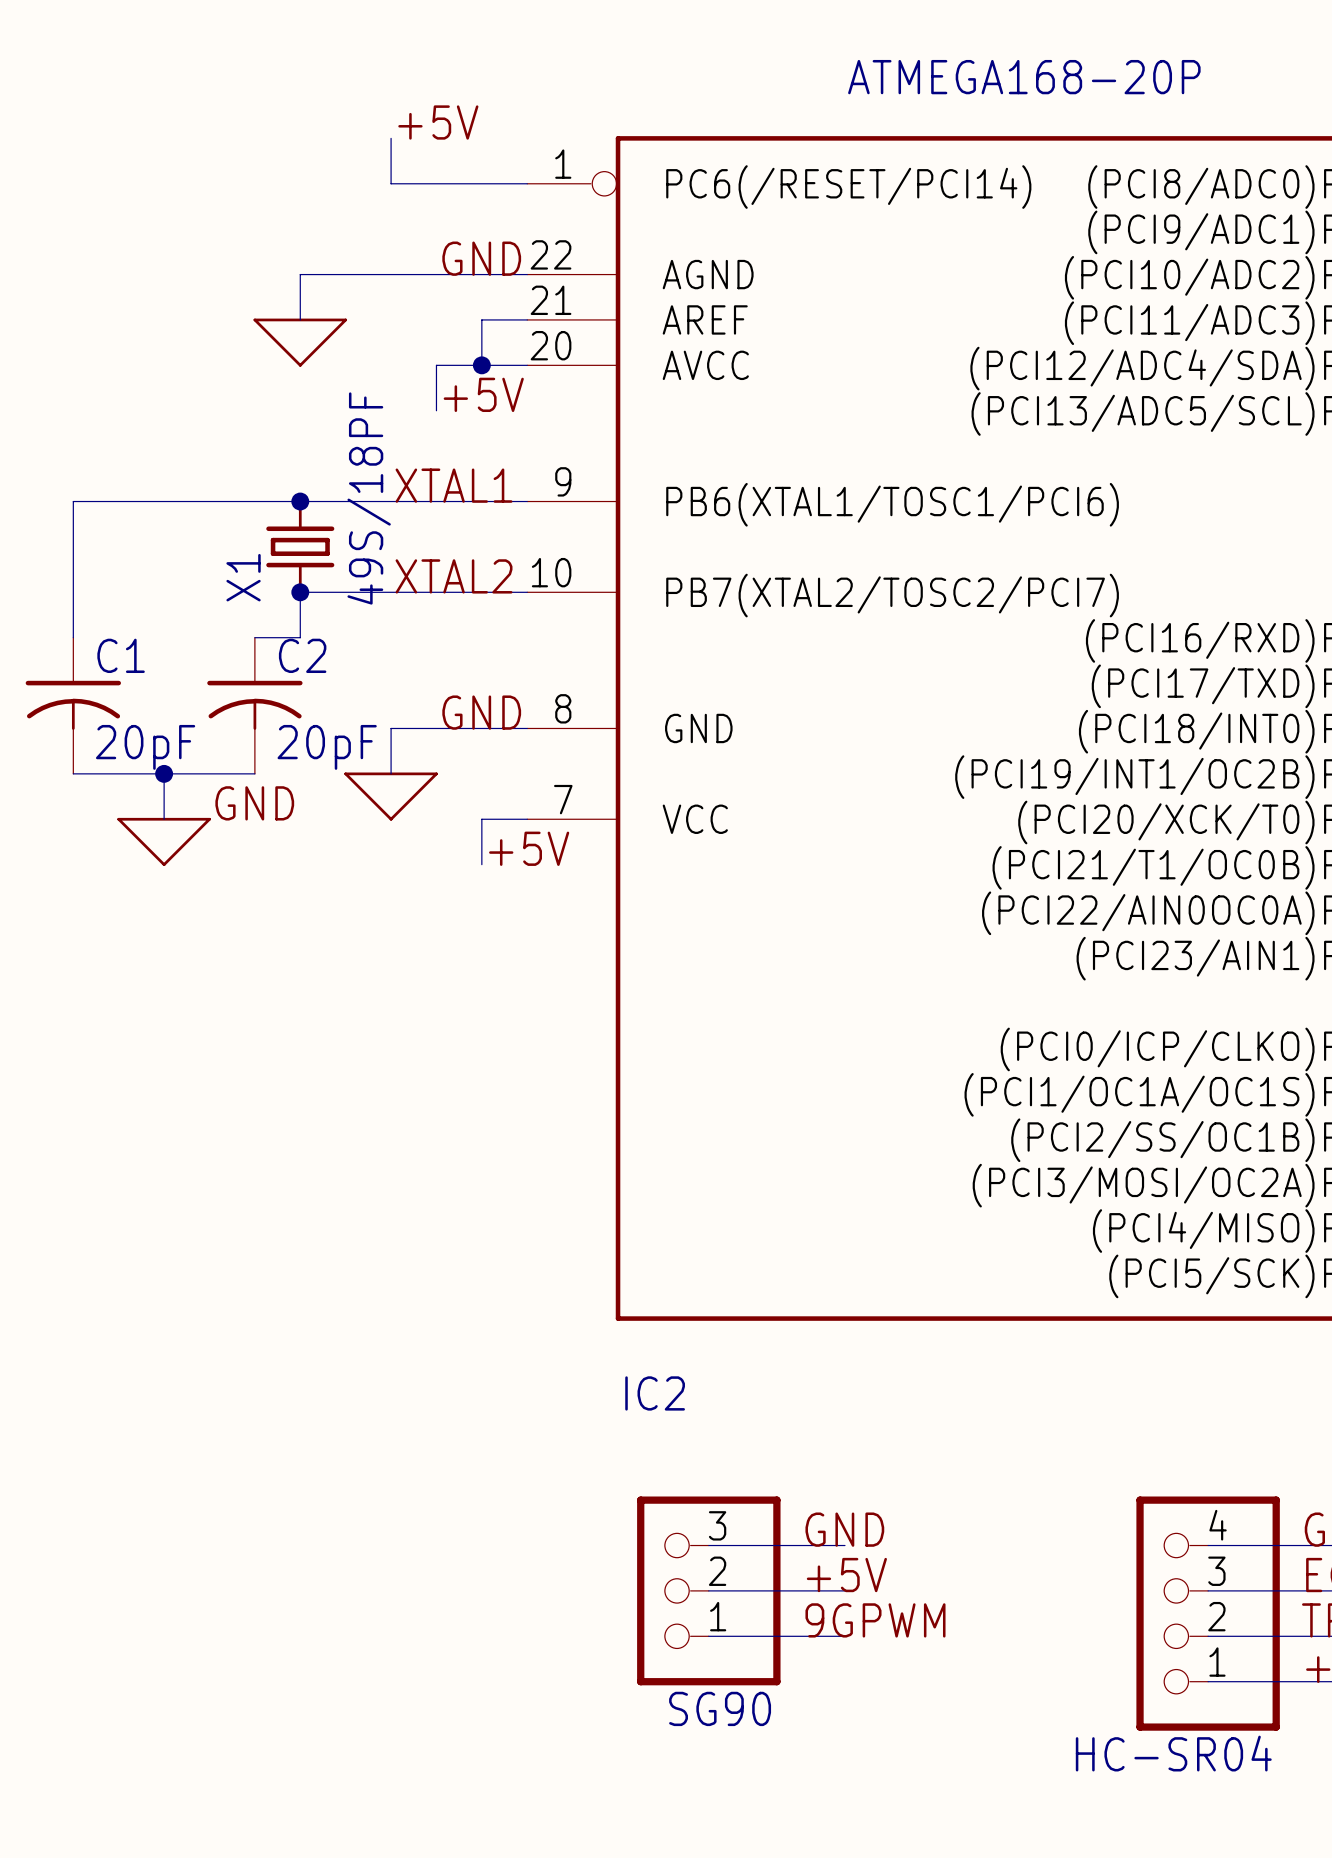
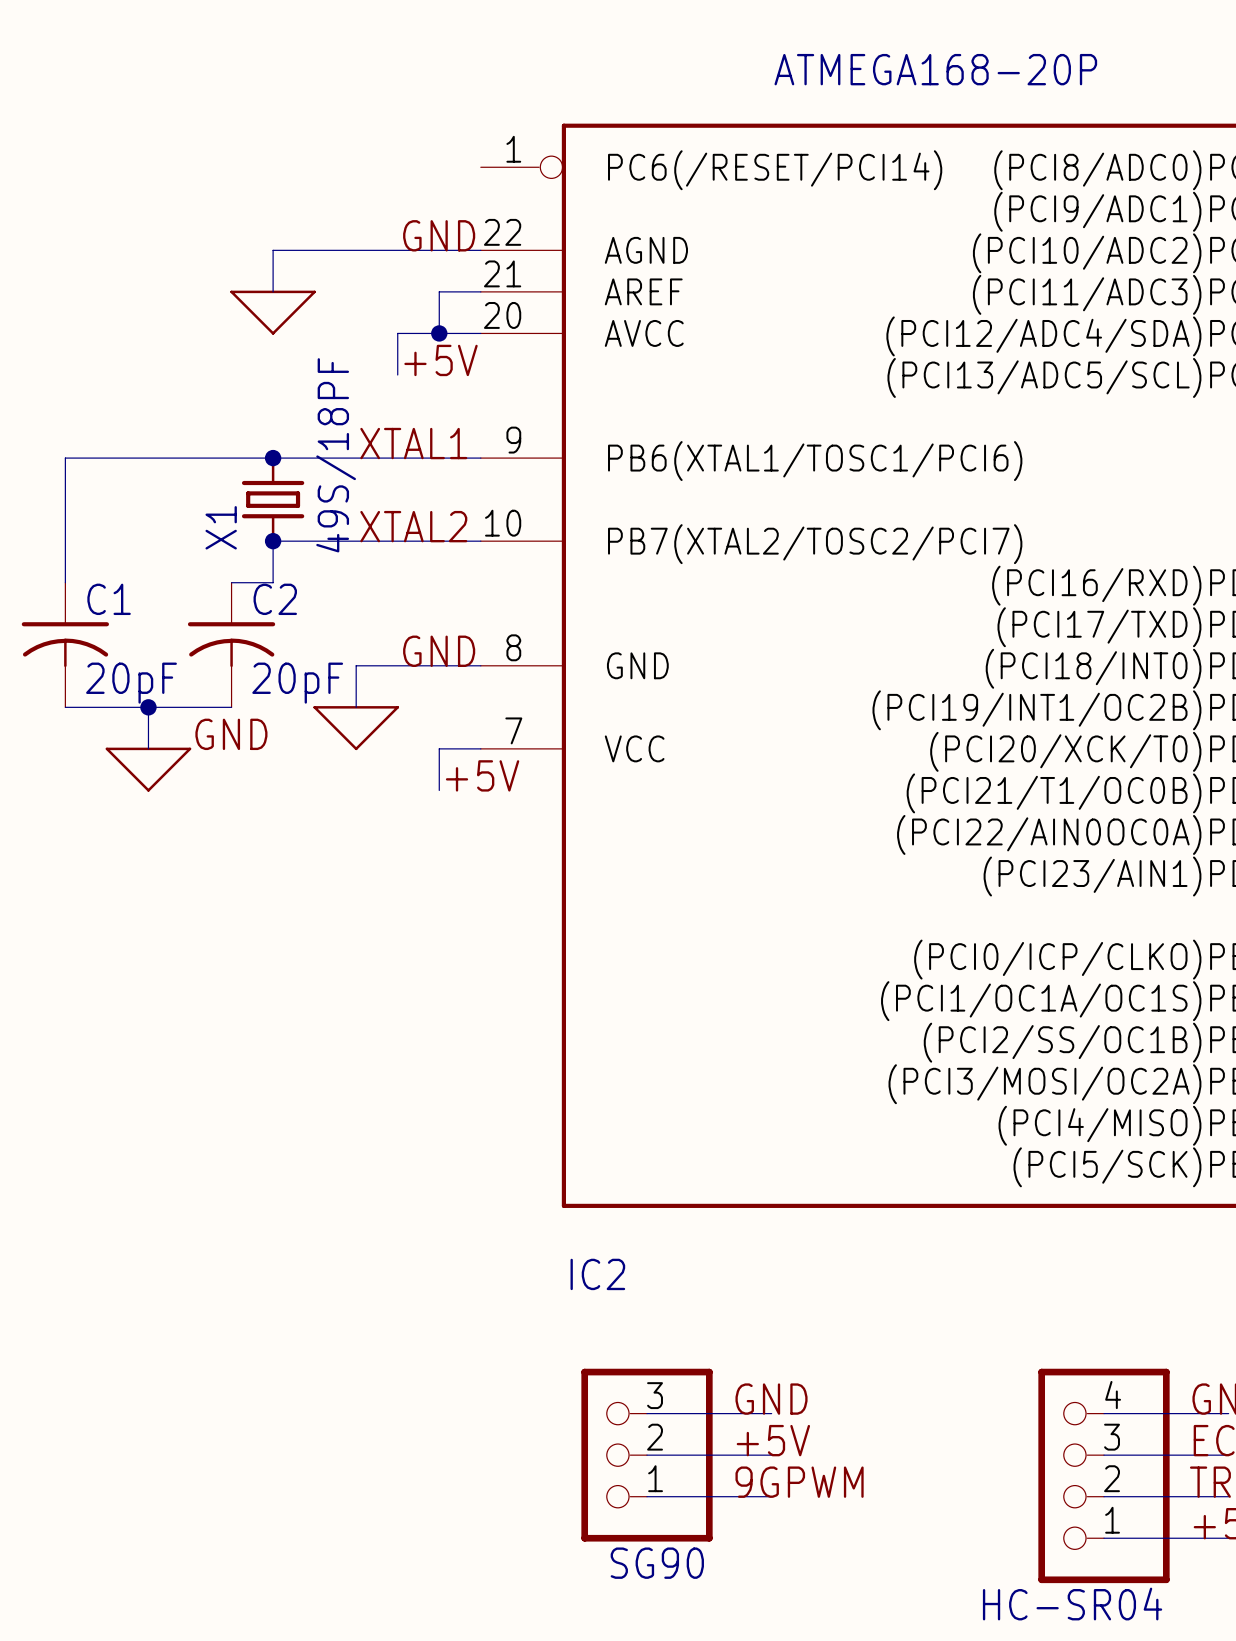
label: +5V (438, 122) -> none
wire: (391, 138) (391, 183) (527, 183) -> none

